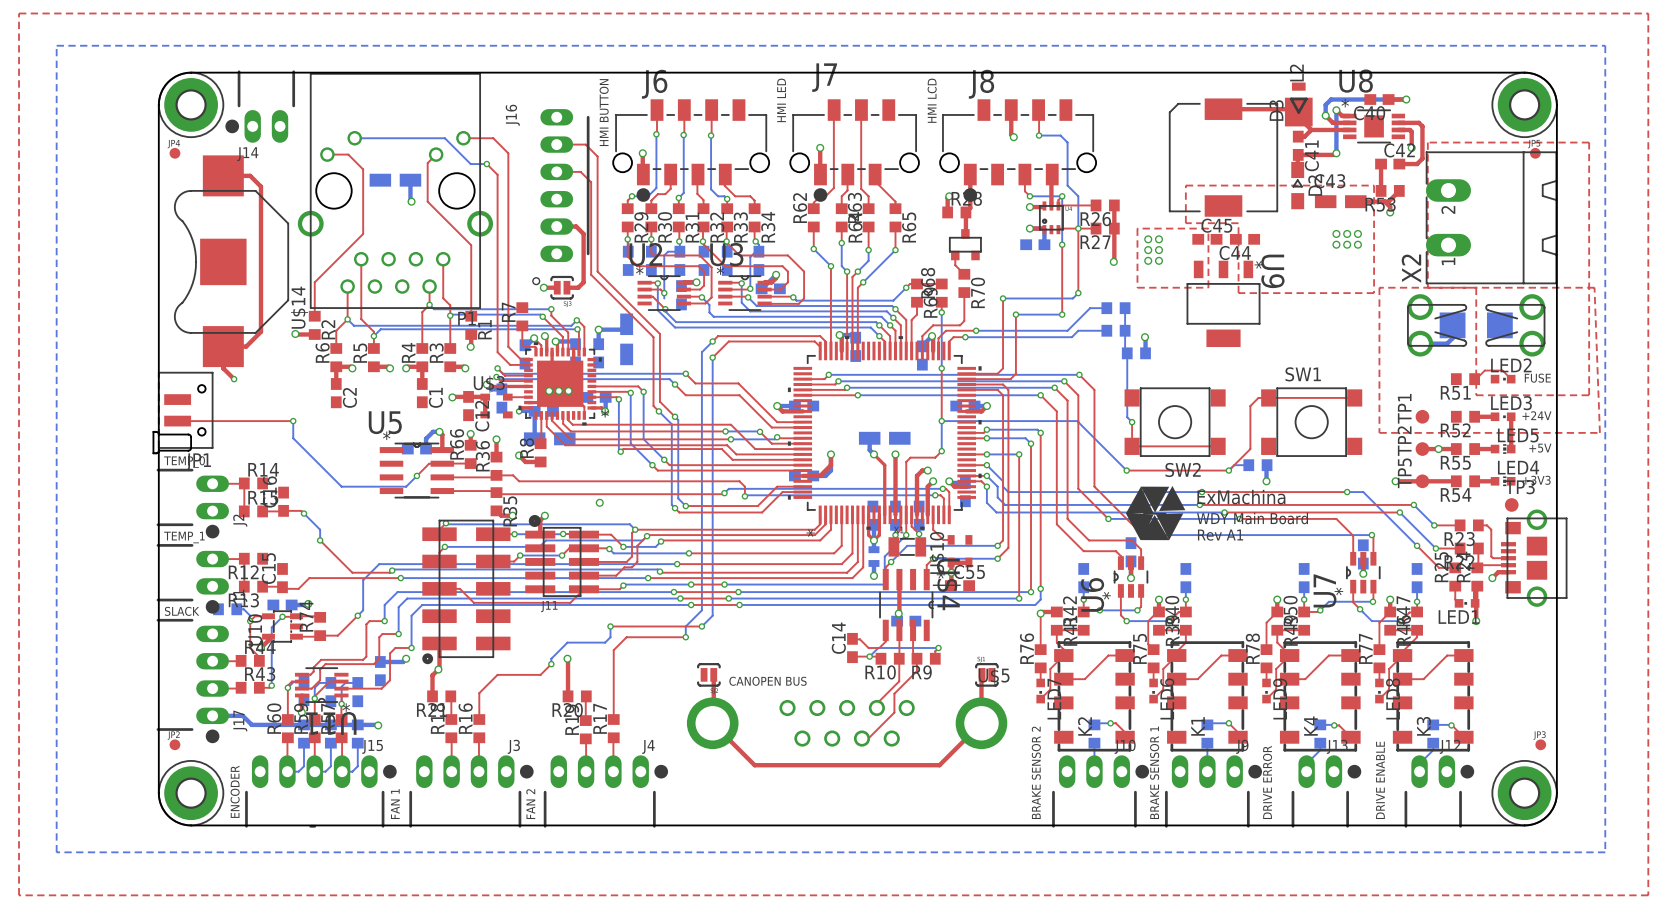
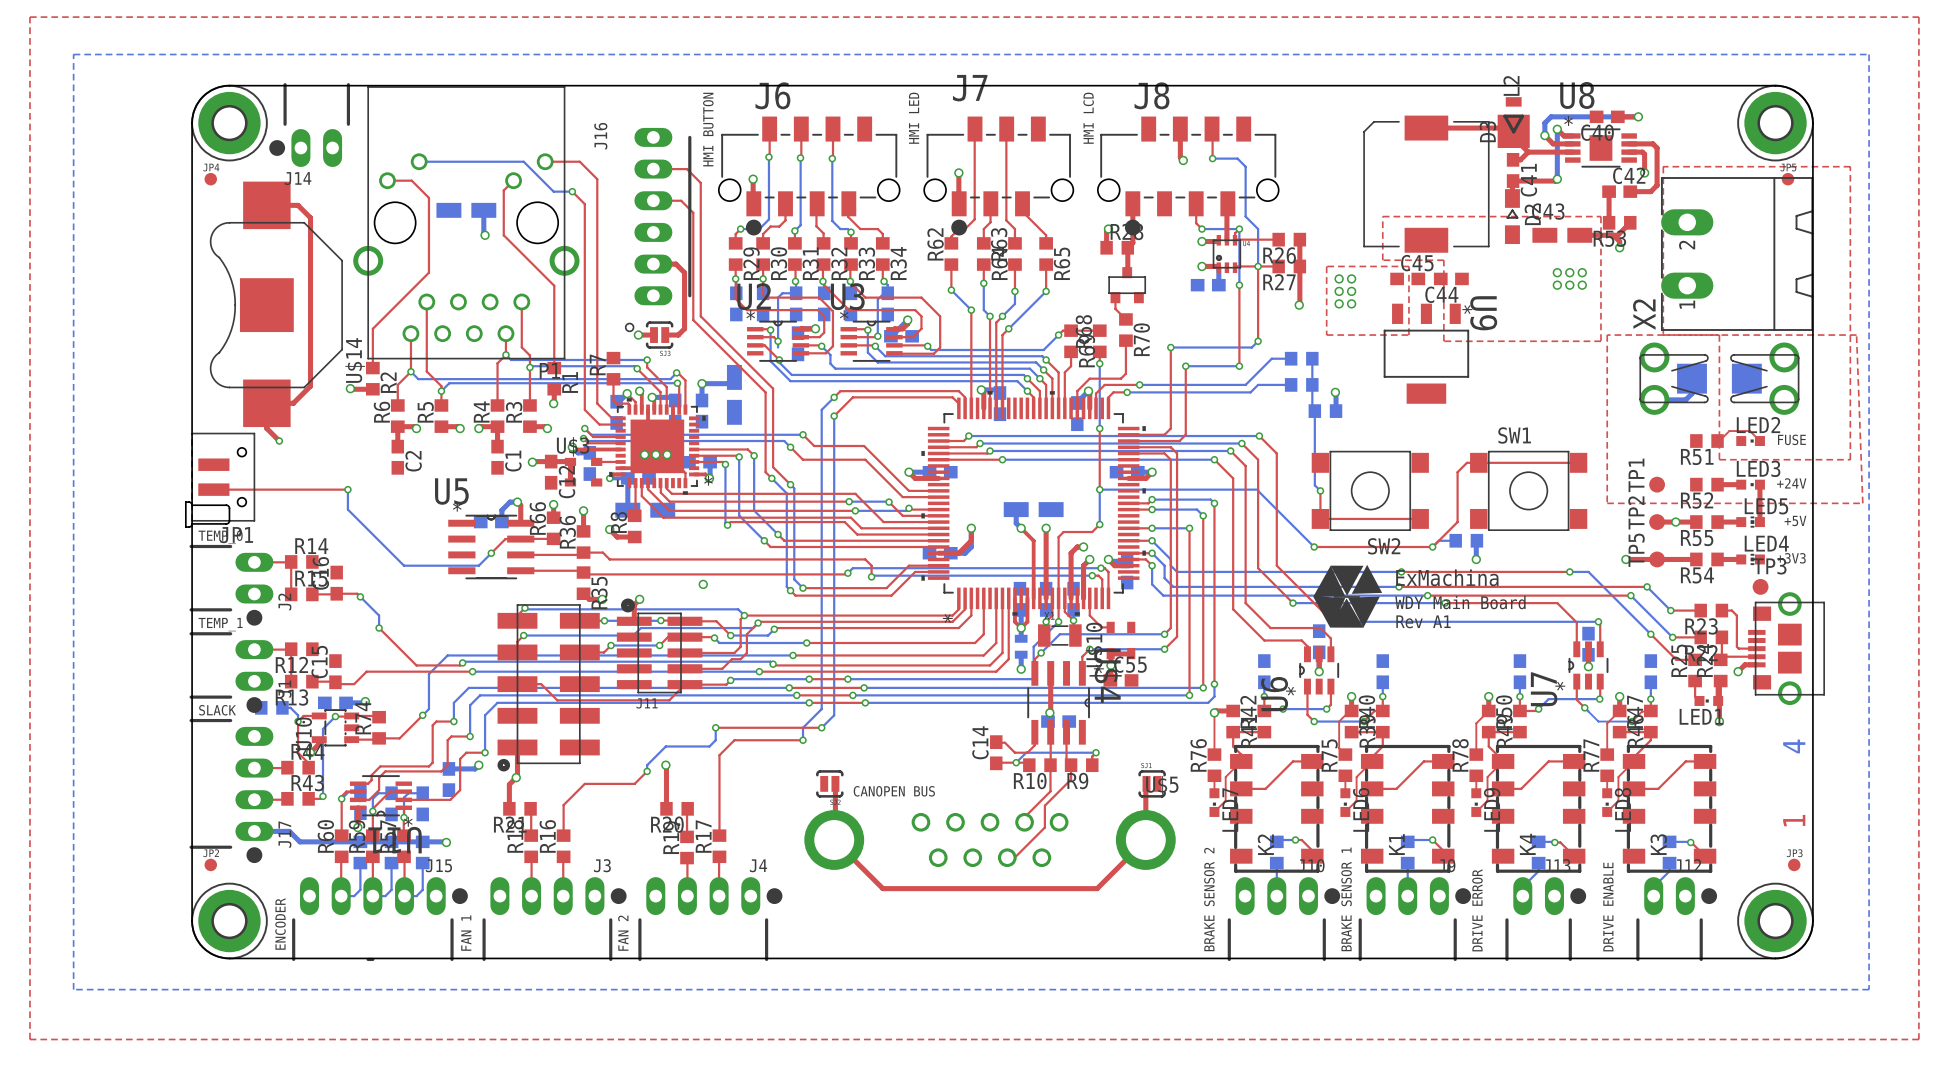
text: none -> 4 (1794, 746)
text: none -> 1 (1794, 820)

